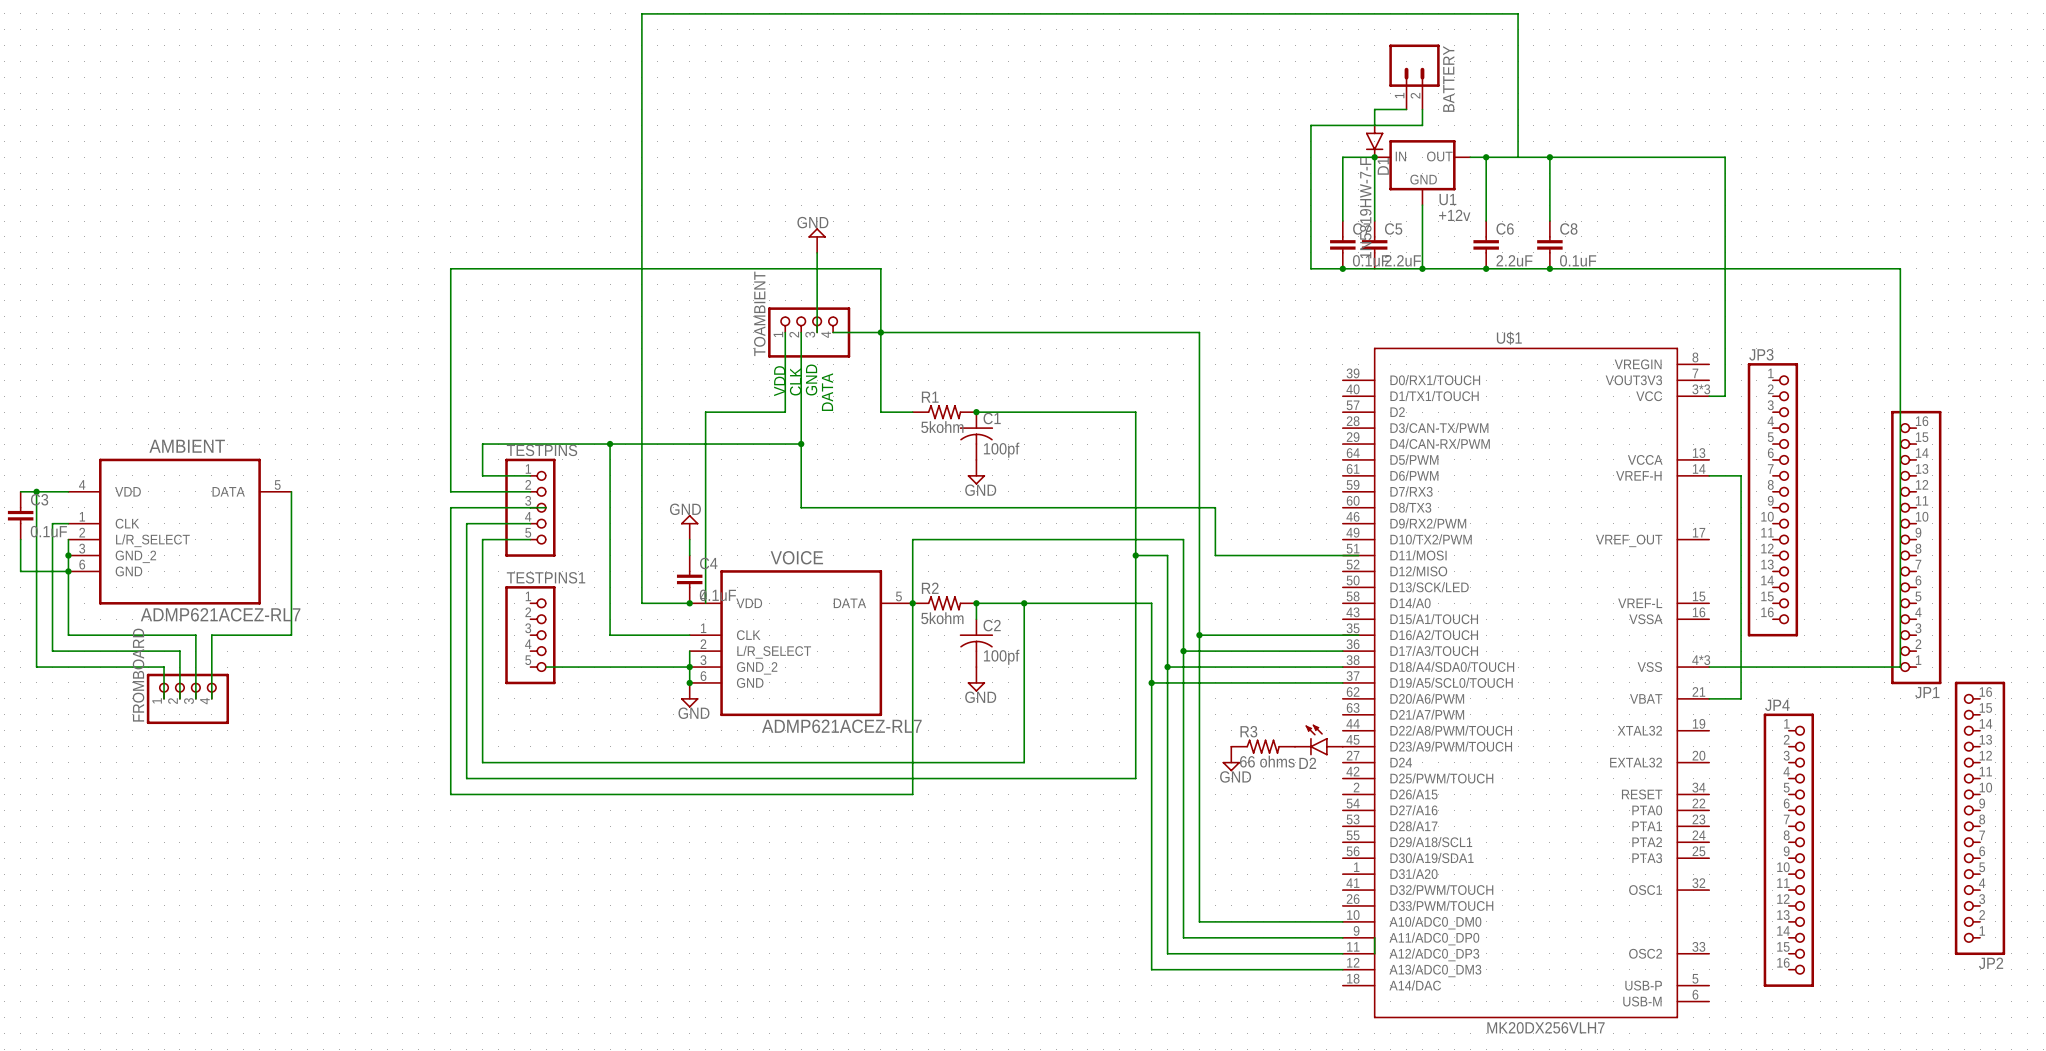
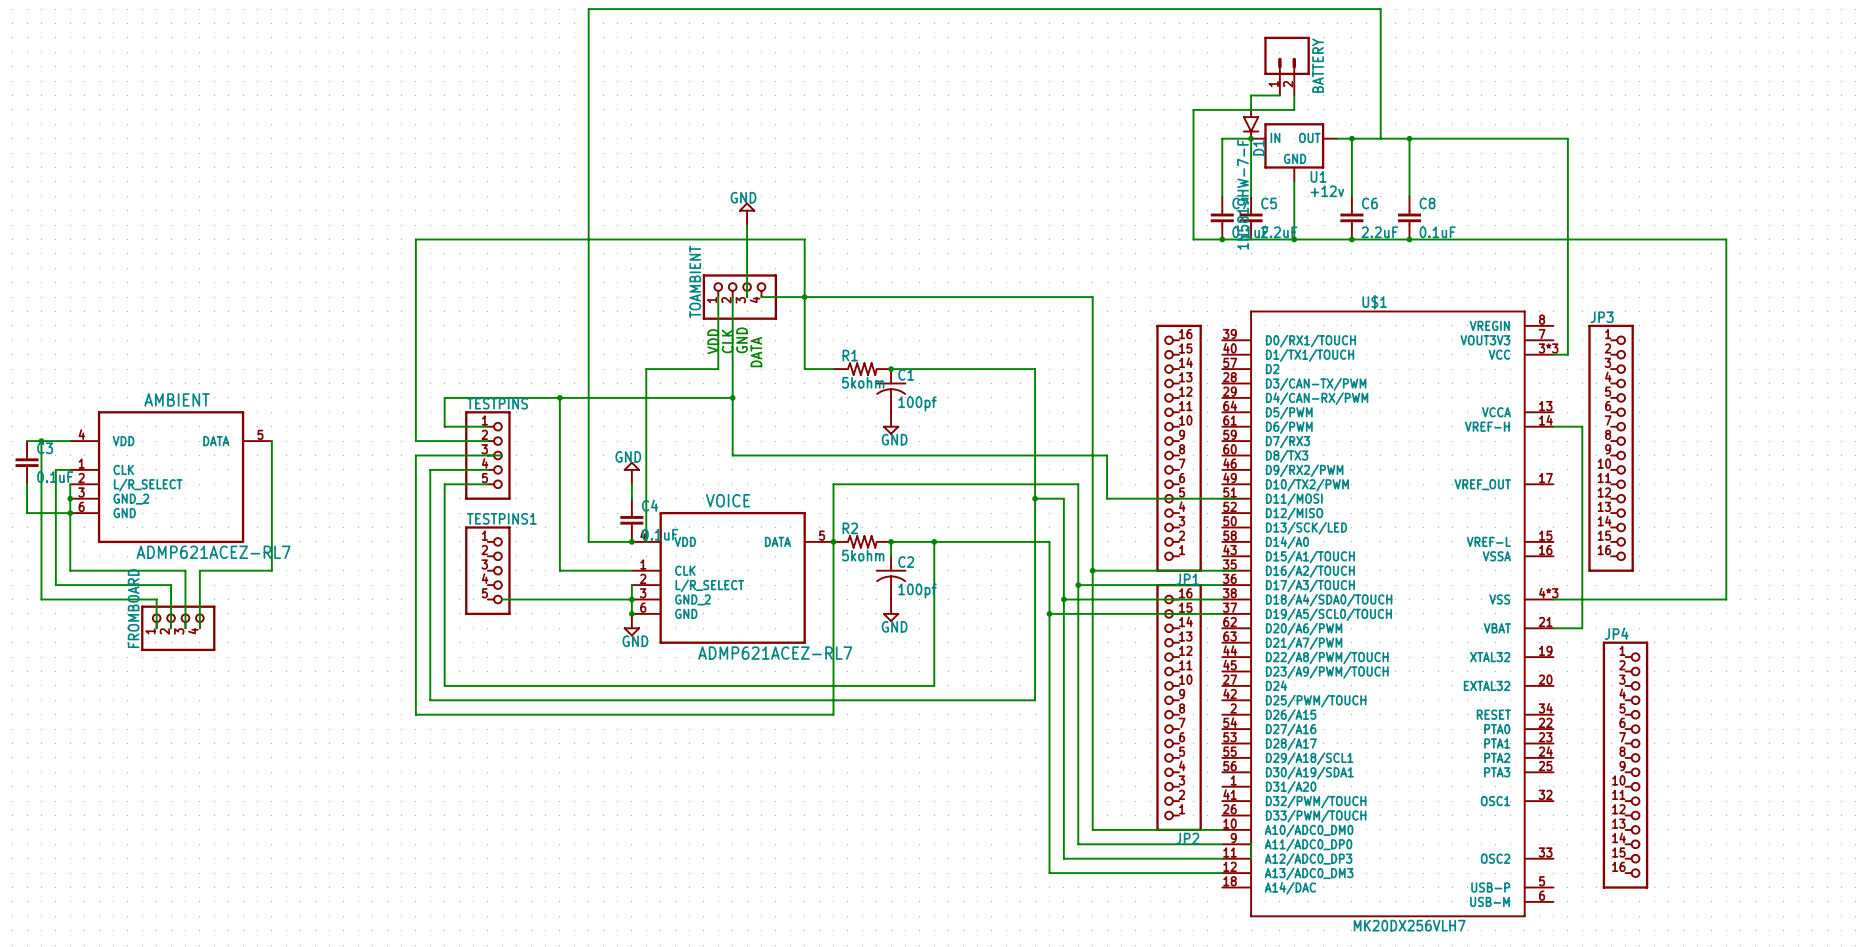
JP1 position: (1916, 547) -> (1179, 448)
D2: (1318, 740) -> none
R3: 66 ohms (1263, 746) -> none
power symbol: GND (1231, 759) -> none
JP2 position: (1980, 818) -> (1179, 707)

